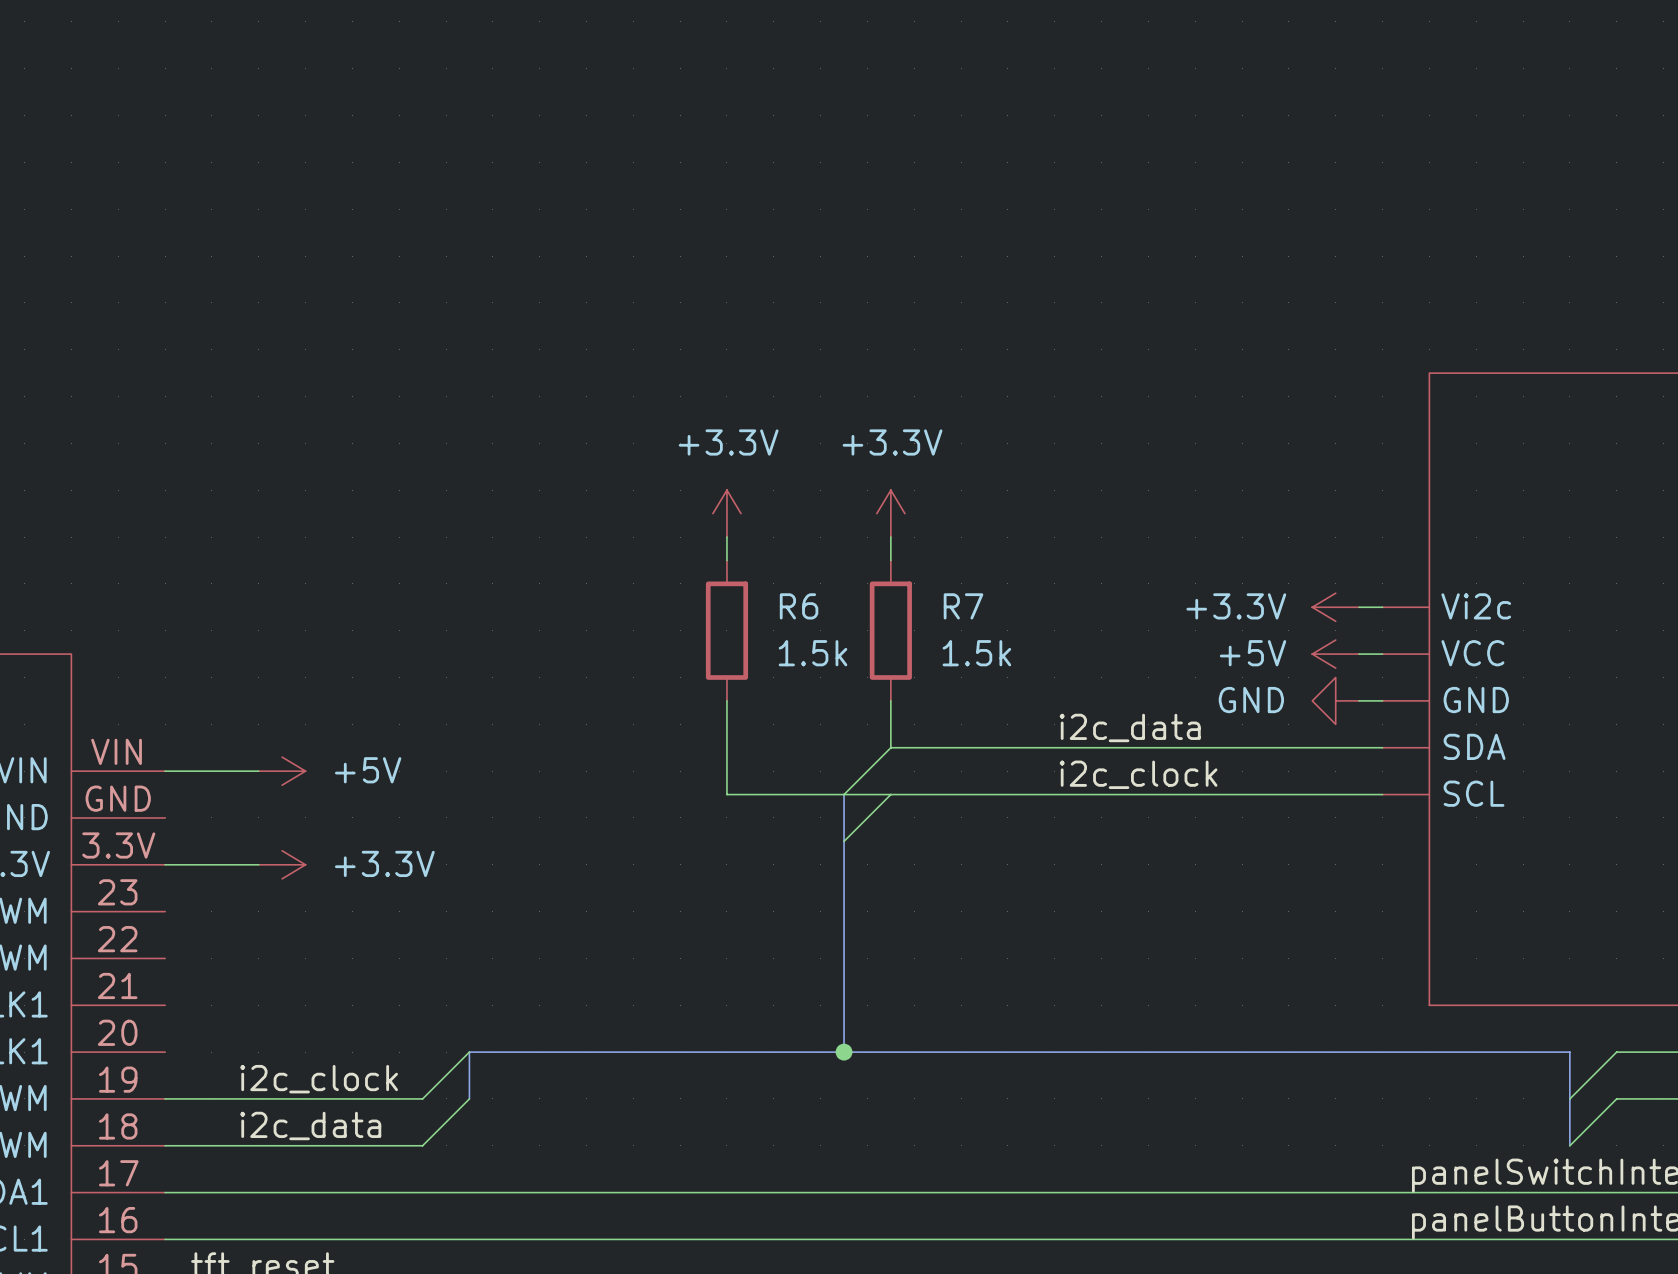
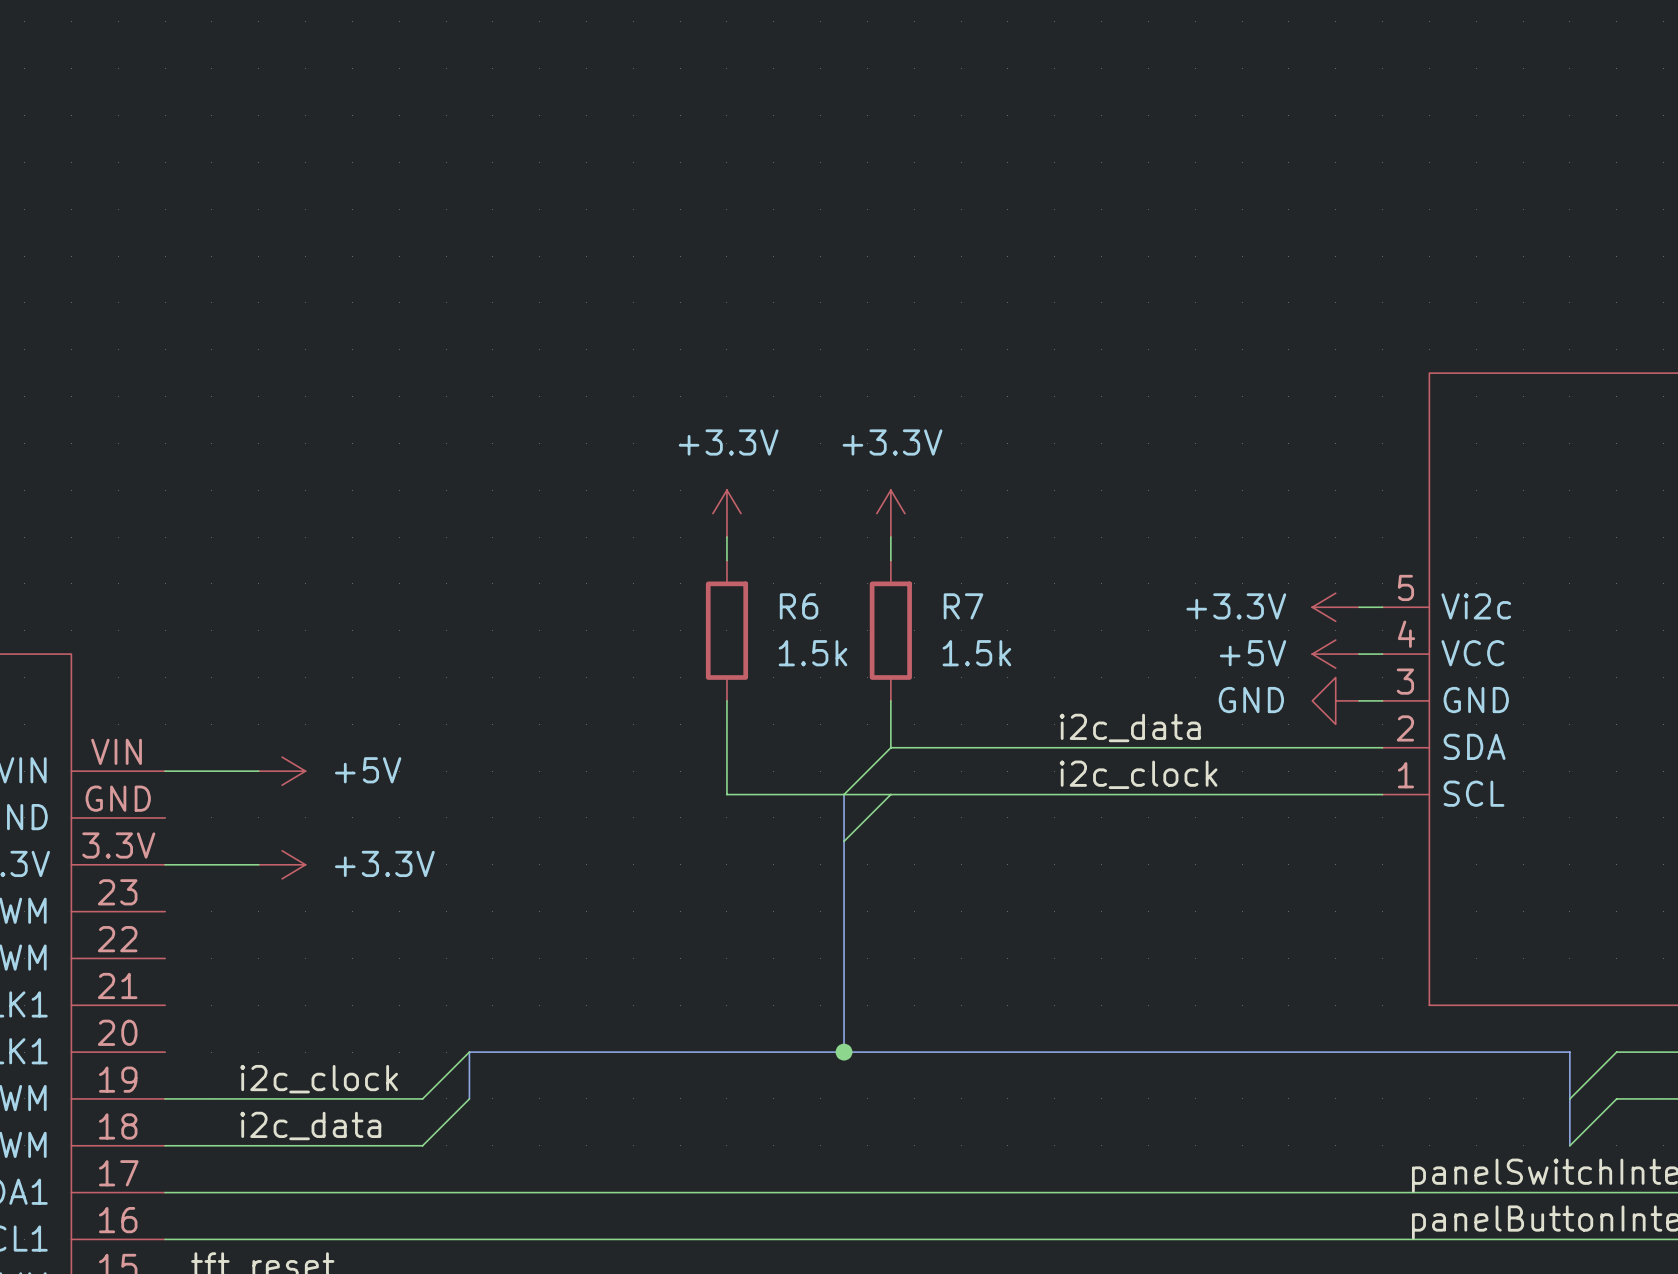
part pin number: none -> 5 (1405, 587)
part pin number: none -> 4 (1406, 634)
part pin number: none -> 3 (1405, 681)
part pin number: none -> 2 (1405, 728)
part pin number: none -> 1 (1405, 775)

